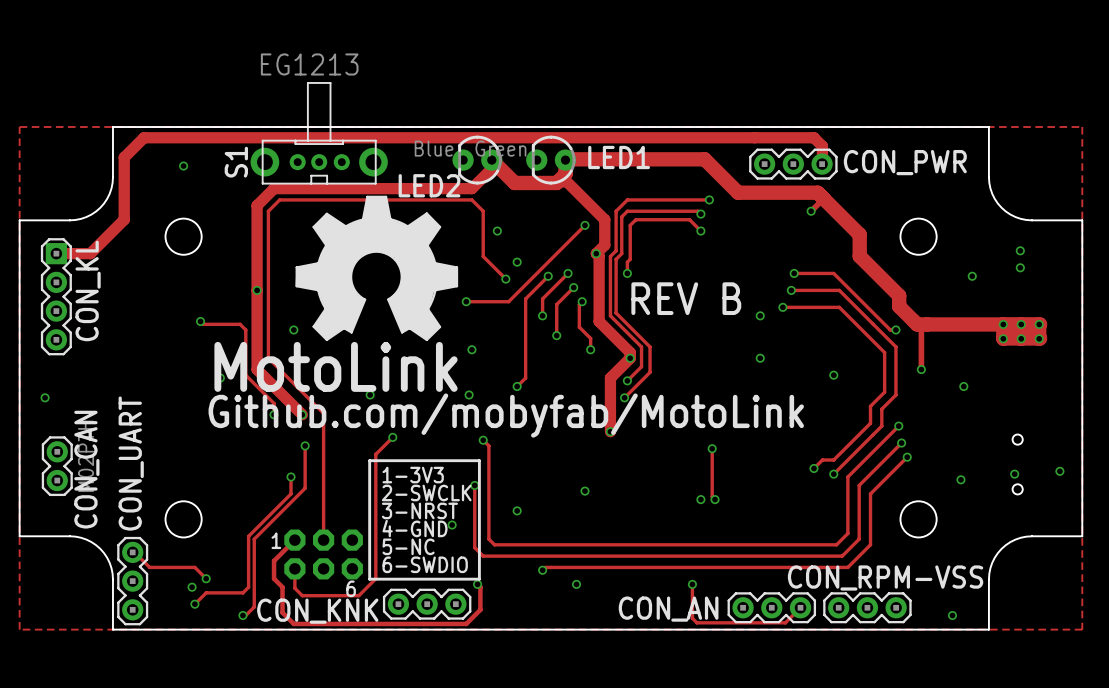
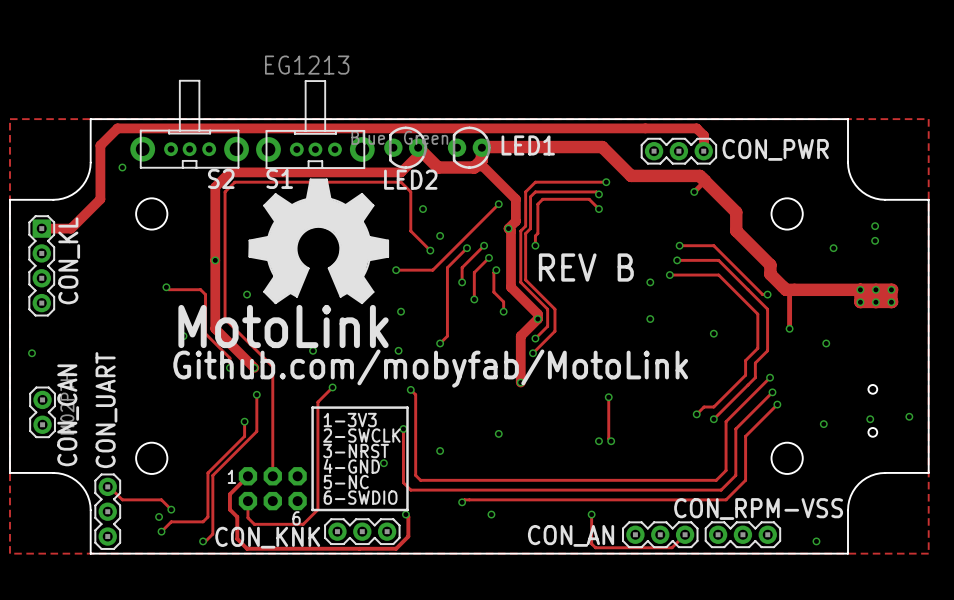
S2: none -> (189, 124)
S1 position: (319, 133) -> (315, 124)
S1 name rotation: 0° (236, 162) -> 90° clockwise (279, 178)
S1 name position: S1 (236, 162) -> S1 (279, 178)
via position: (183, 166) -> (122, 167)
LED2 name position: LED2 (429, 185) -> LED2 (410, 179)

